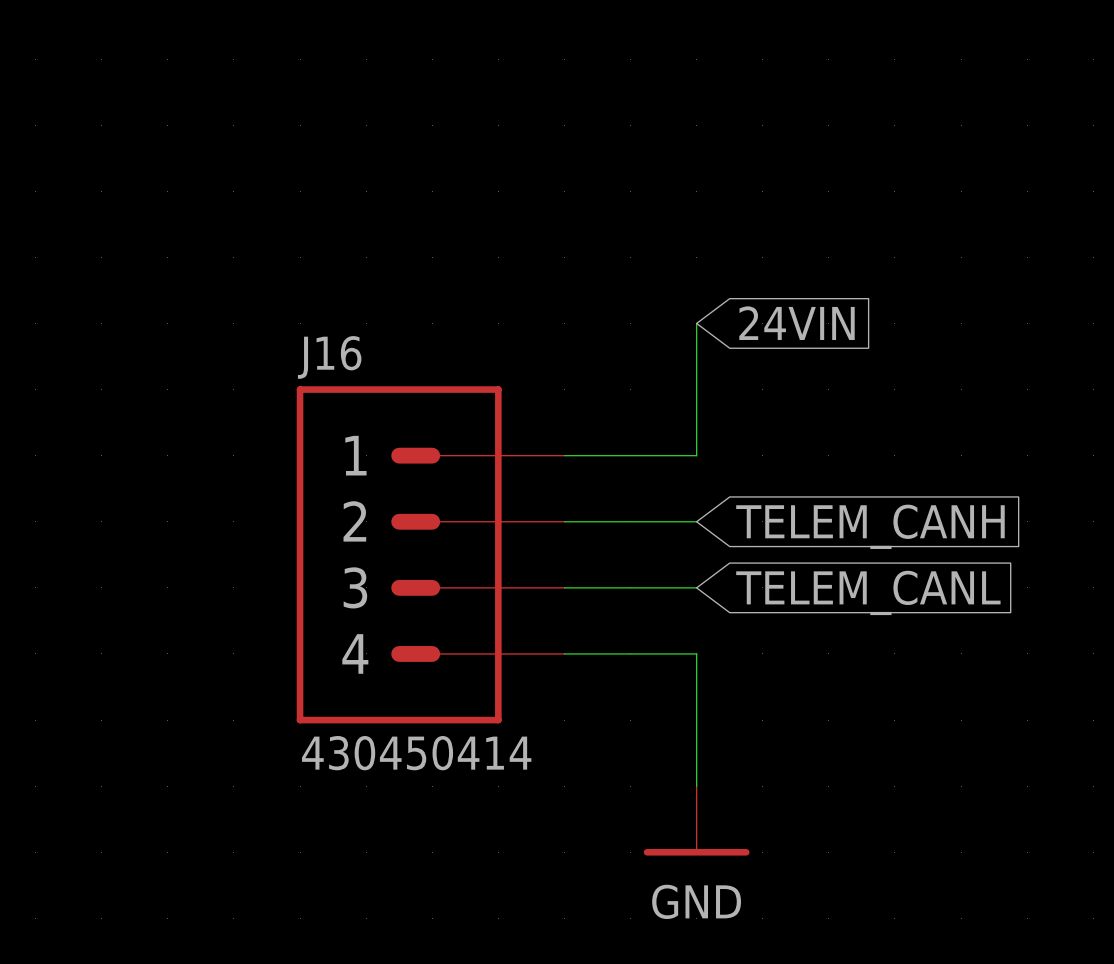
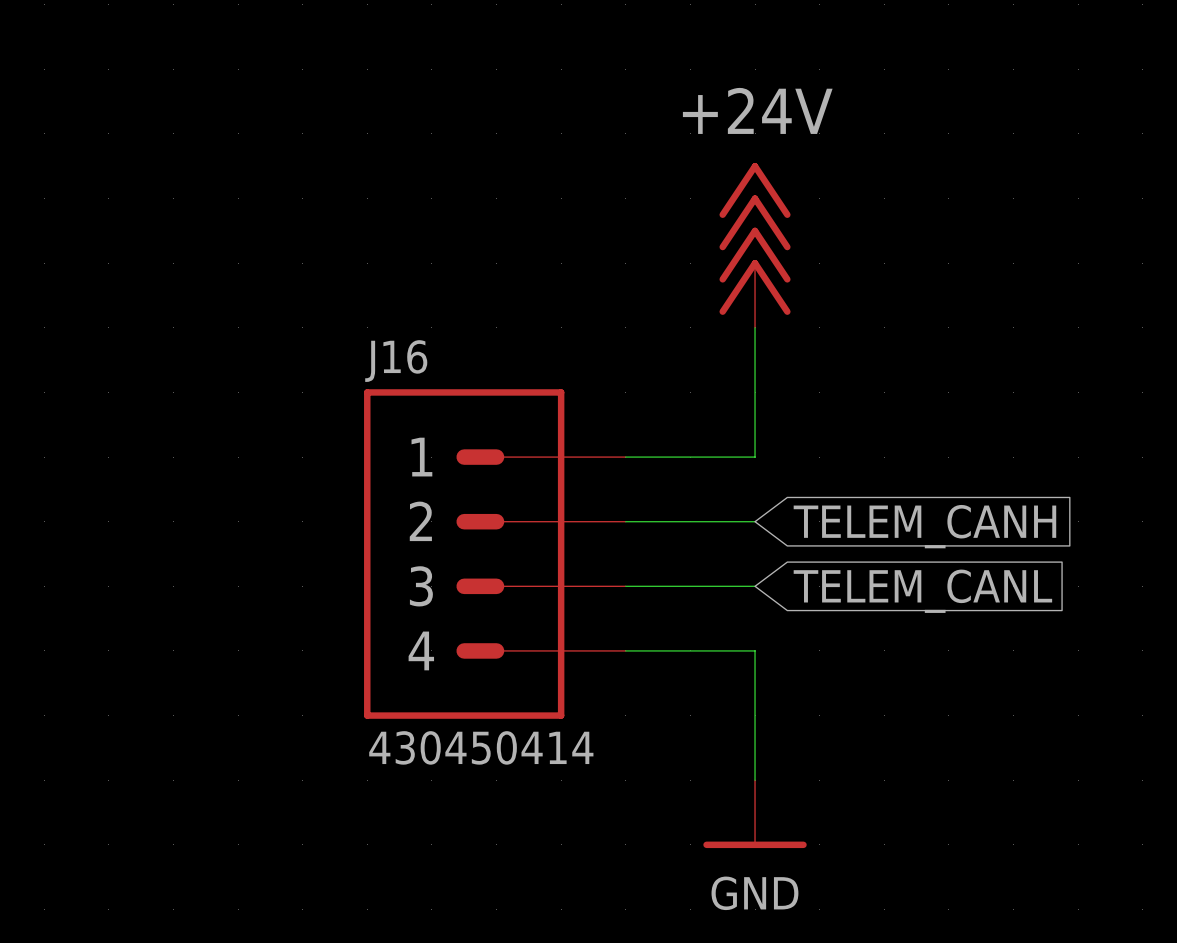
power symbol: none -> +24V (755, 245)
global label: 24VIN (797, 323) -> none

